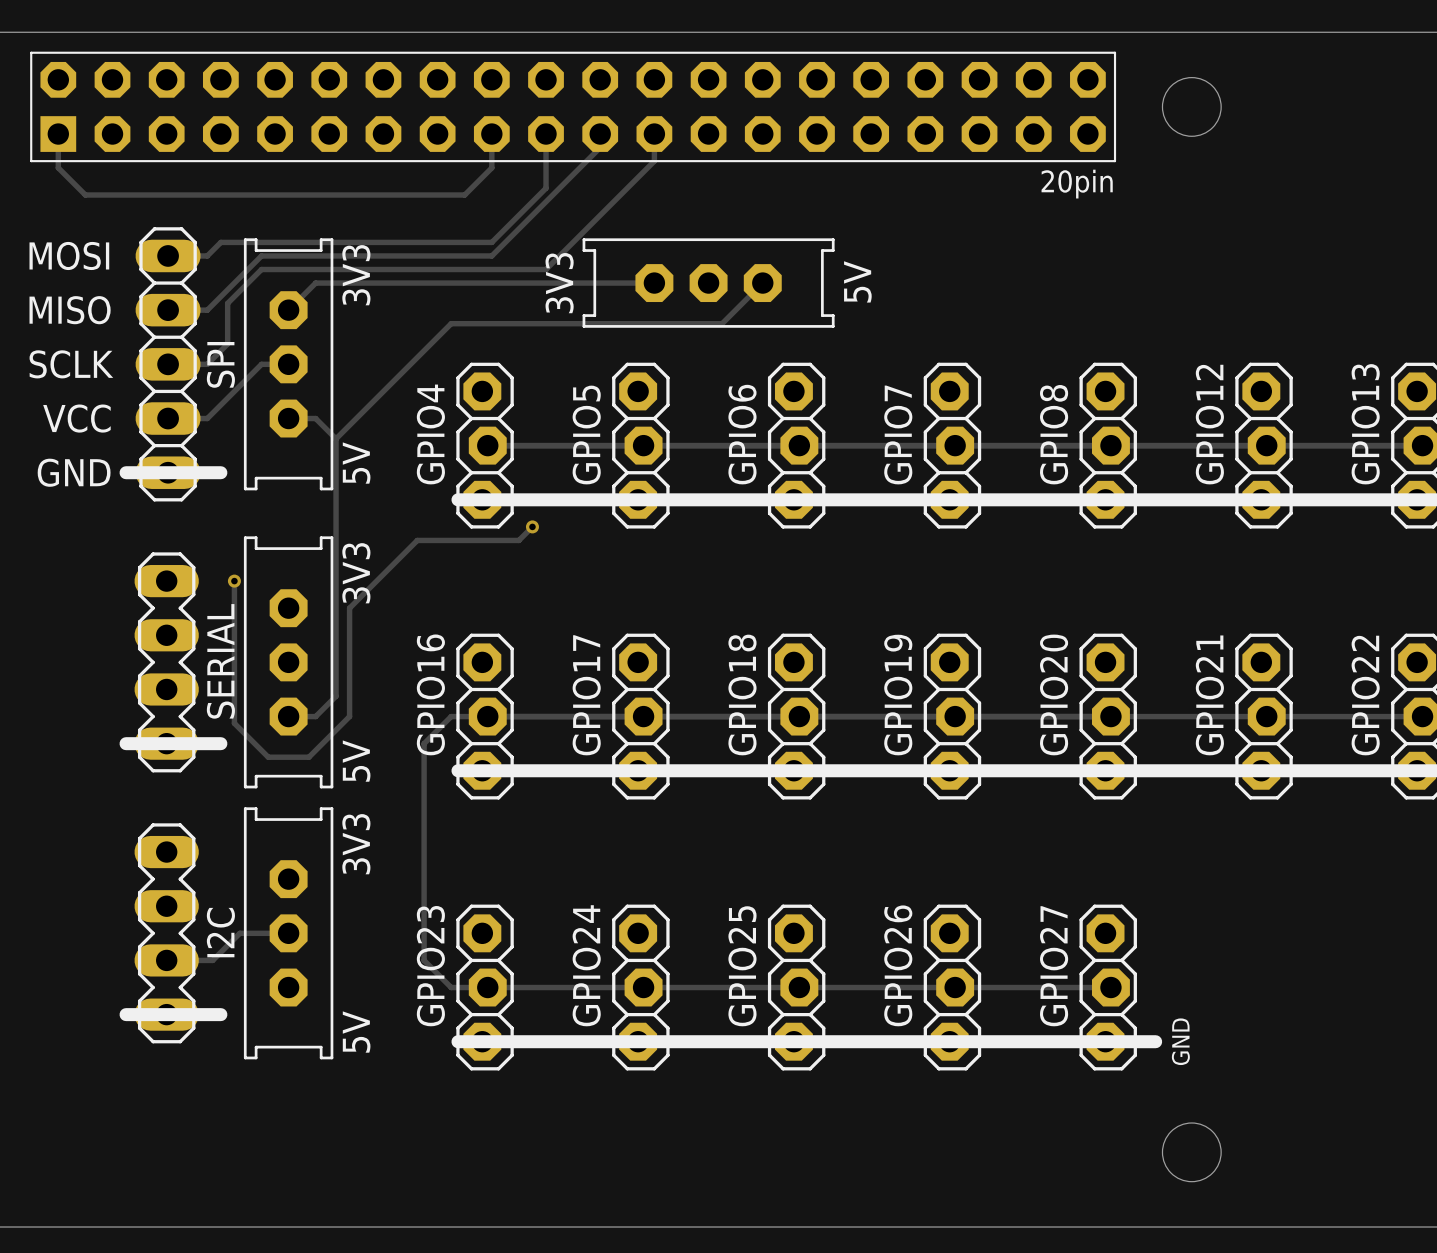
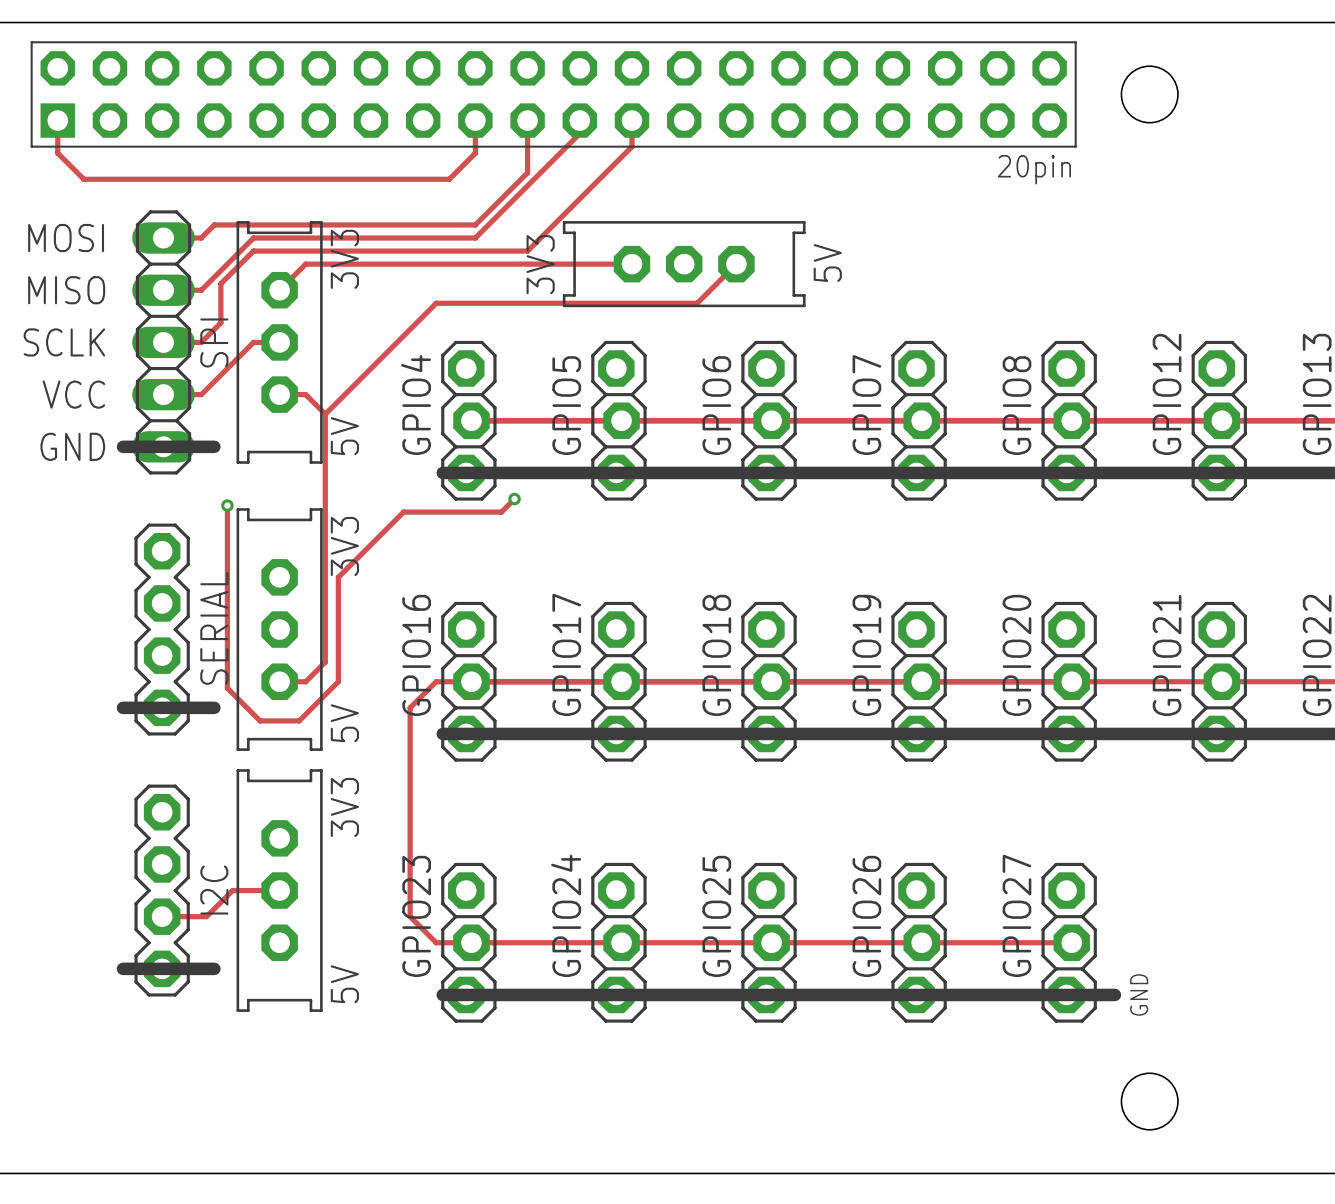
track: none -> (227, 505) (227, 551)
part footprint: [134, 552, 199, 773] -> [134, 523, 190, 736]
via position: (234, 581) -> (227, 505)
part footprint: [134, 823, 199, 1044] -> [134, 784, 190, 997]

